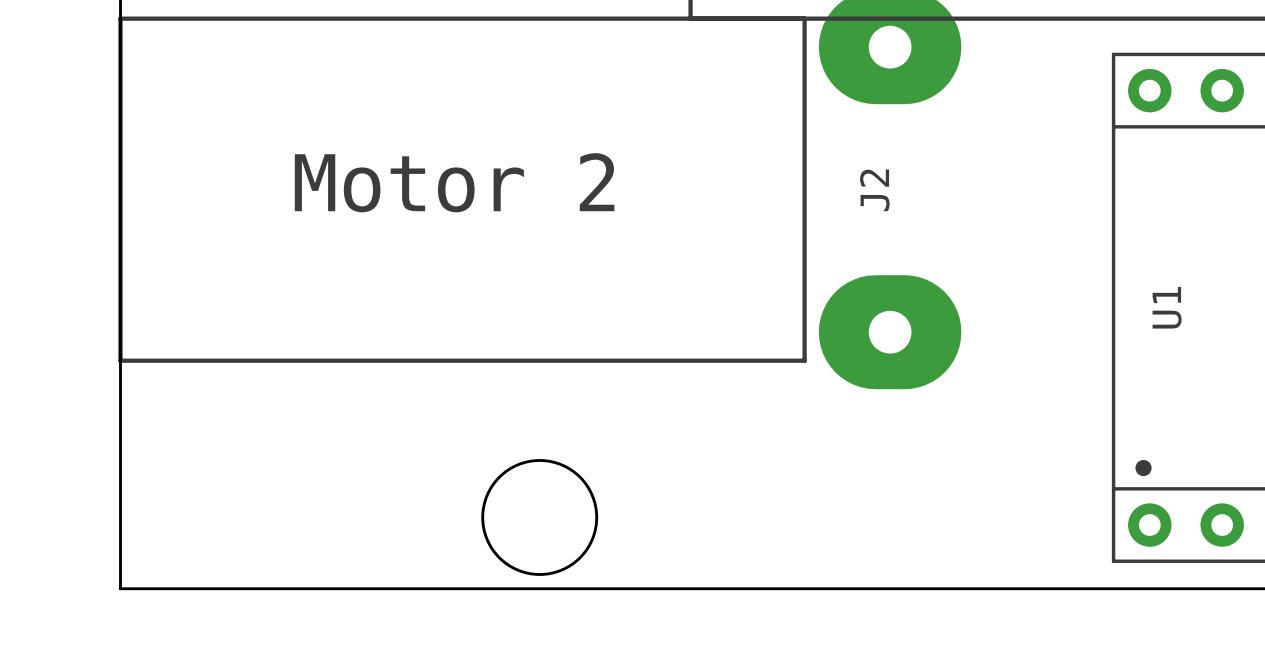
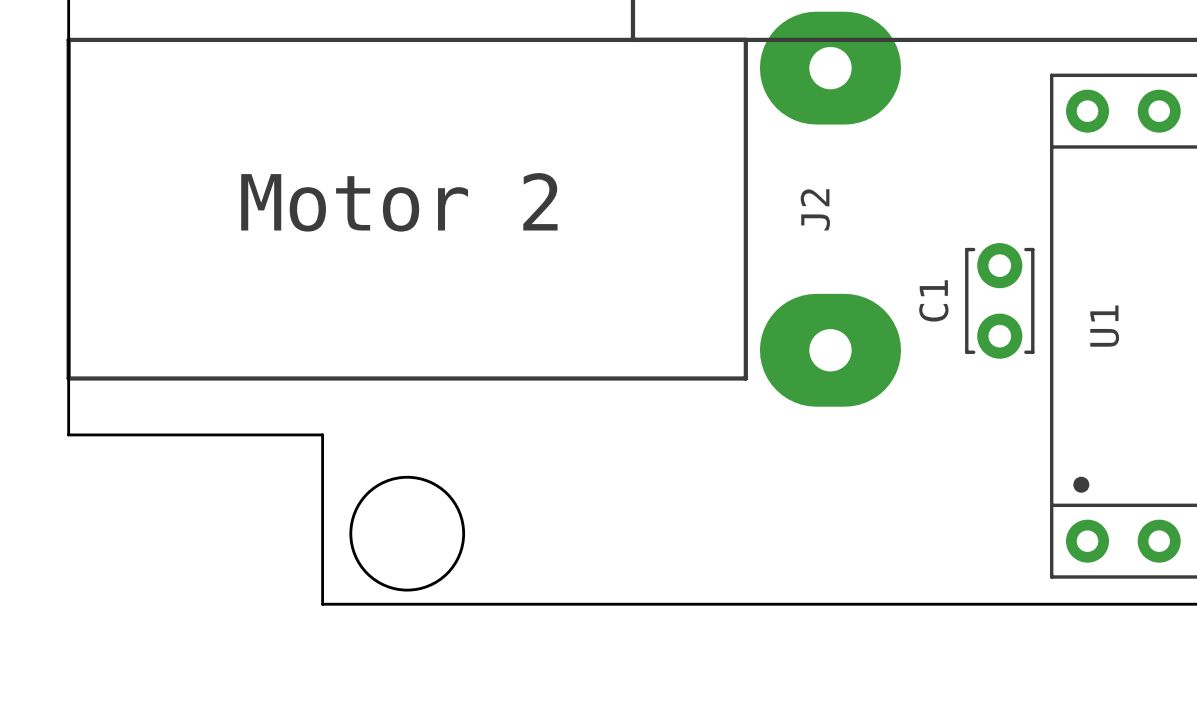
C1: none -> (999, 300)
board edge: (120, 417) (120, 588) (377, 588) -> (68, 434) (322, 434) (322, 604)
round board edge position: (539, 517) -> (407, 533)

